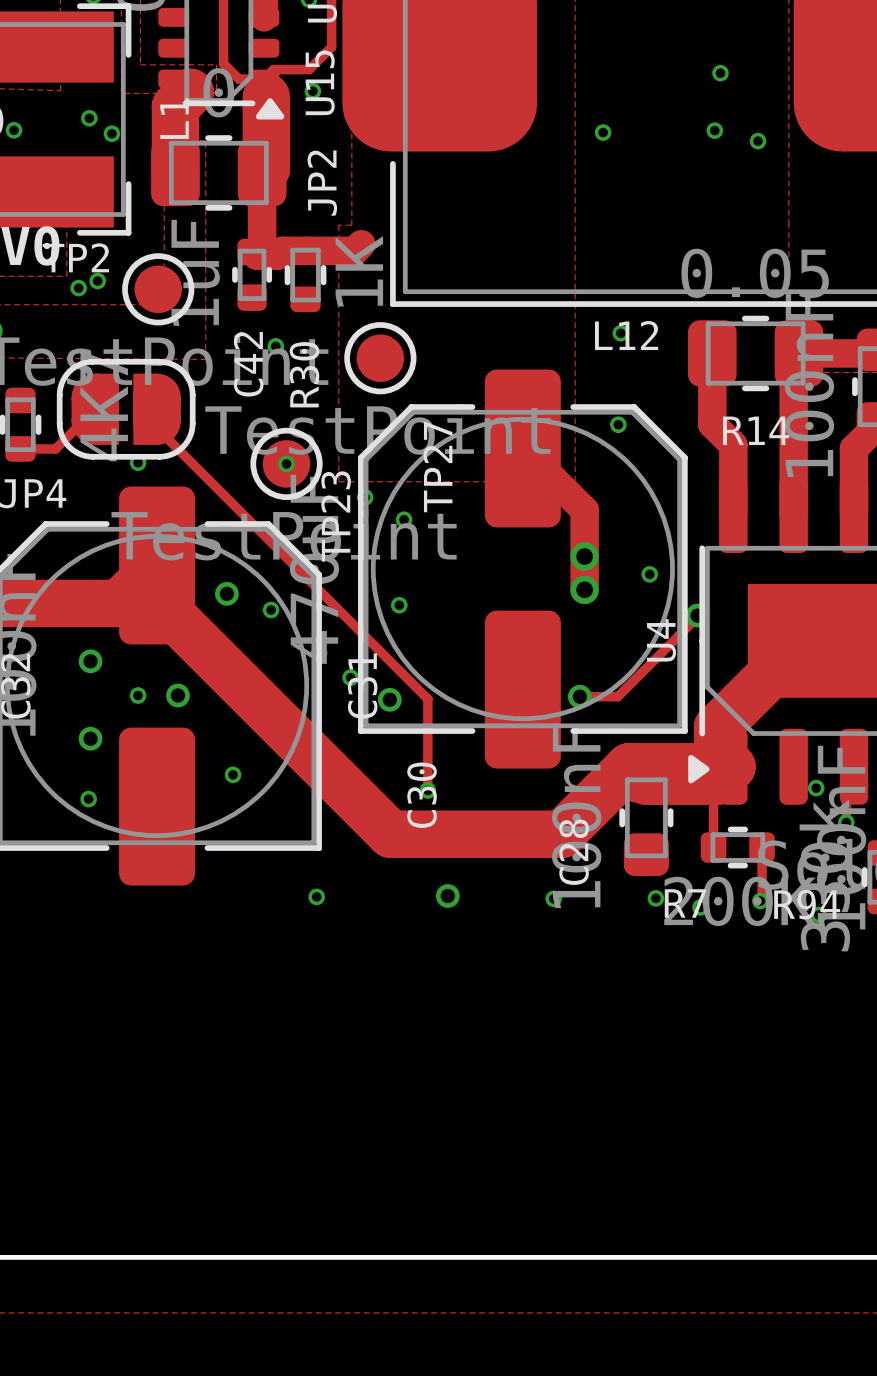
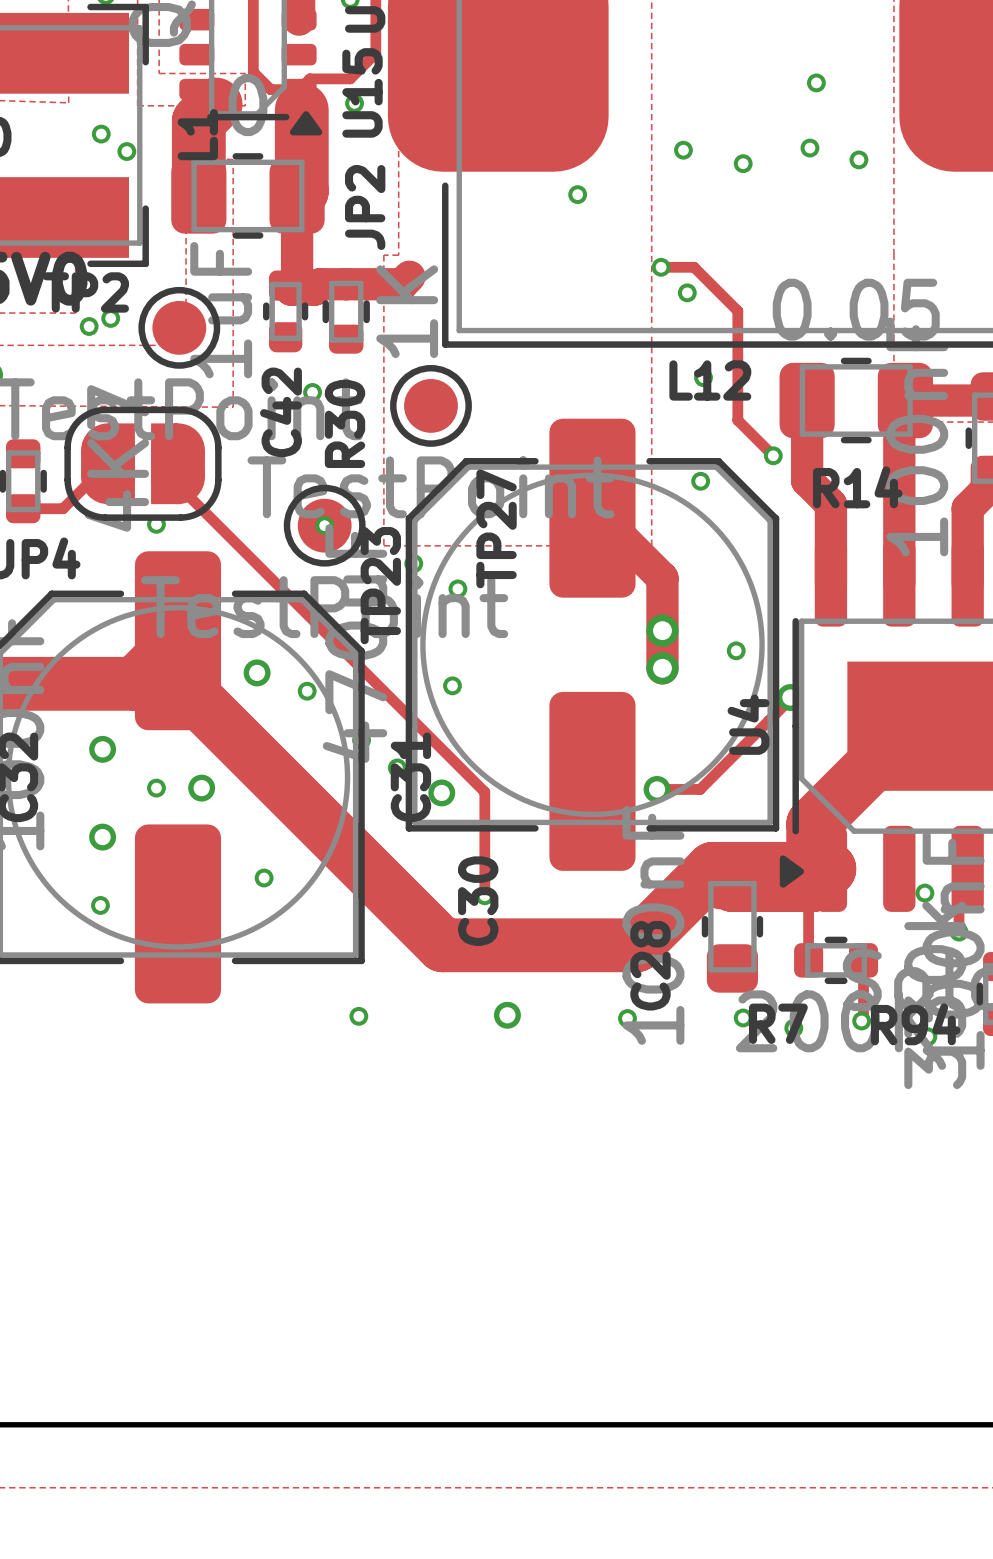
via: (14, 130) -> none
via: none -> (743, 163)
via: none -> (577, 194)
track: none -> (661, 267) (694, 267) (737, 311) (737, 420) (773, 455)
via: none -> (661, 267)
via: none -> (687, 292)
via: none -> (773, 455)

